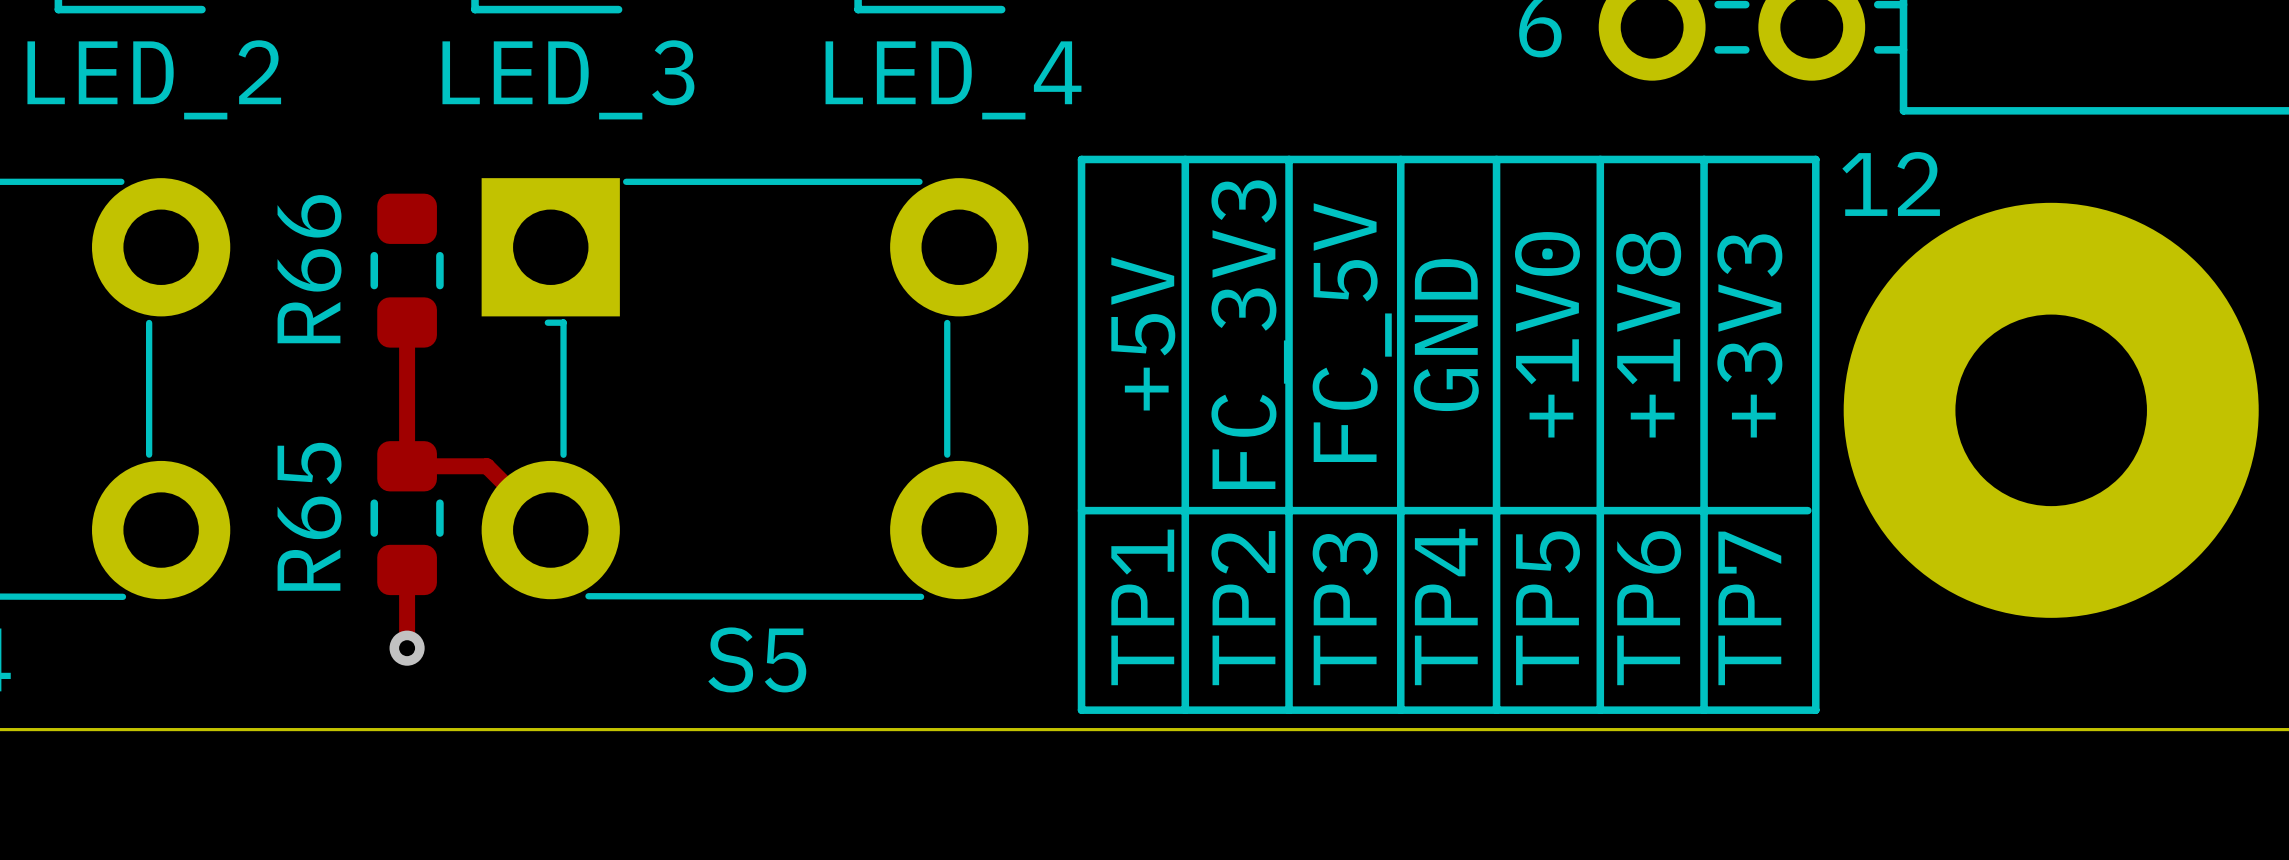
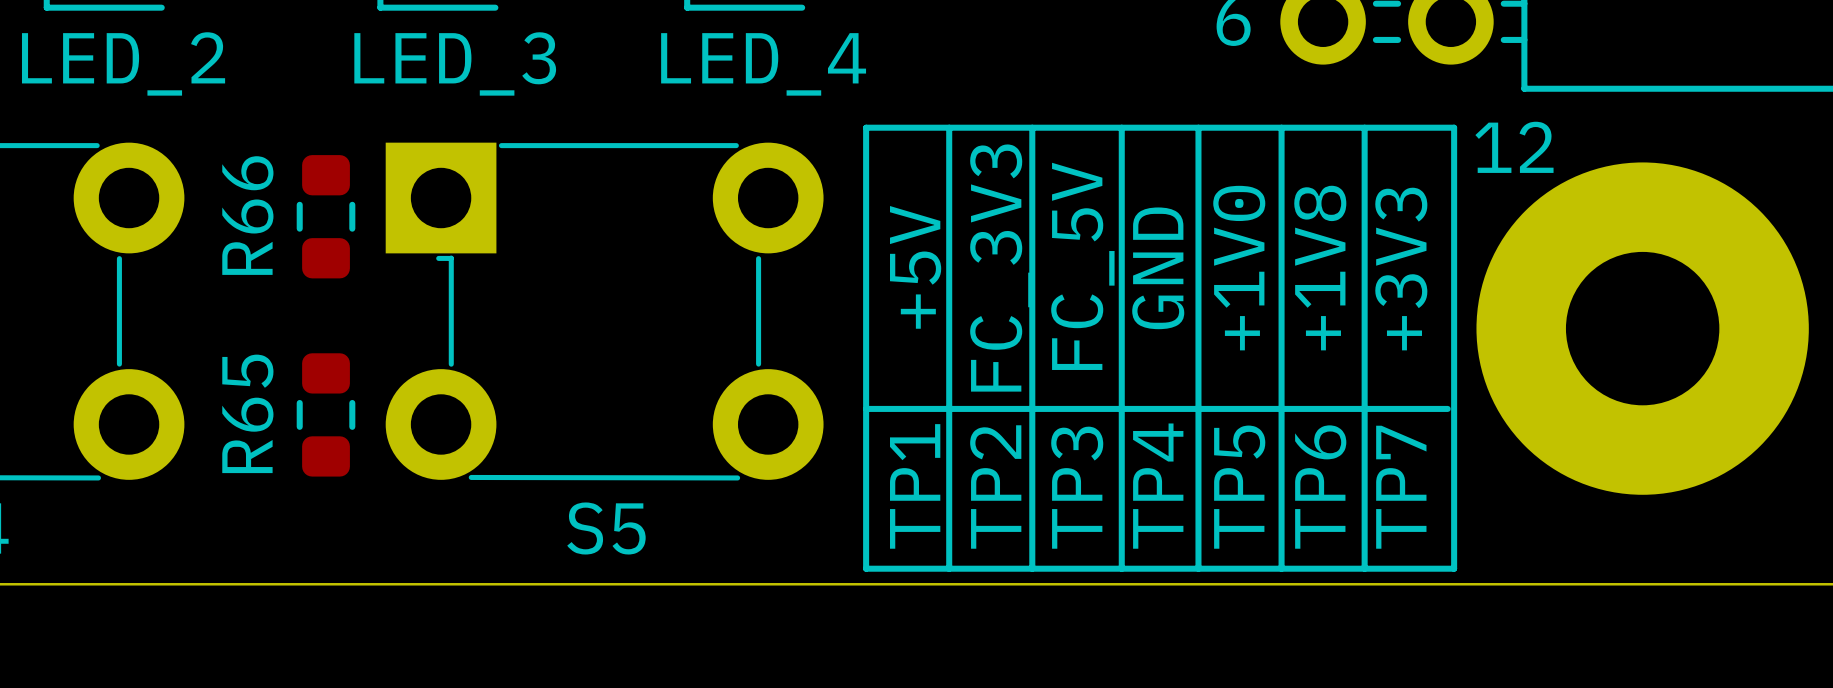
top track: (407, 322) (407, 466) (486, 466) (550, 530) -> none
top track: (407, 569) (407, 648) -> none
via: (407, 648) -> none

